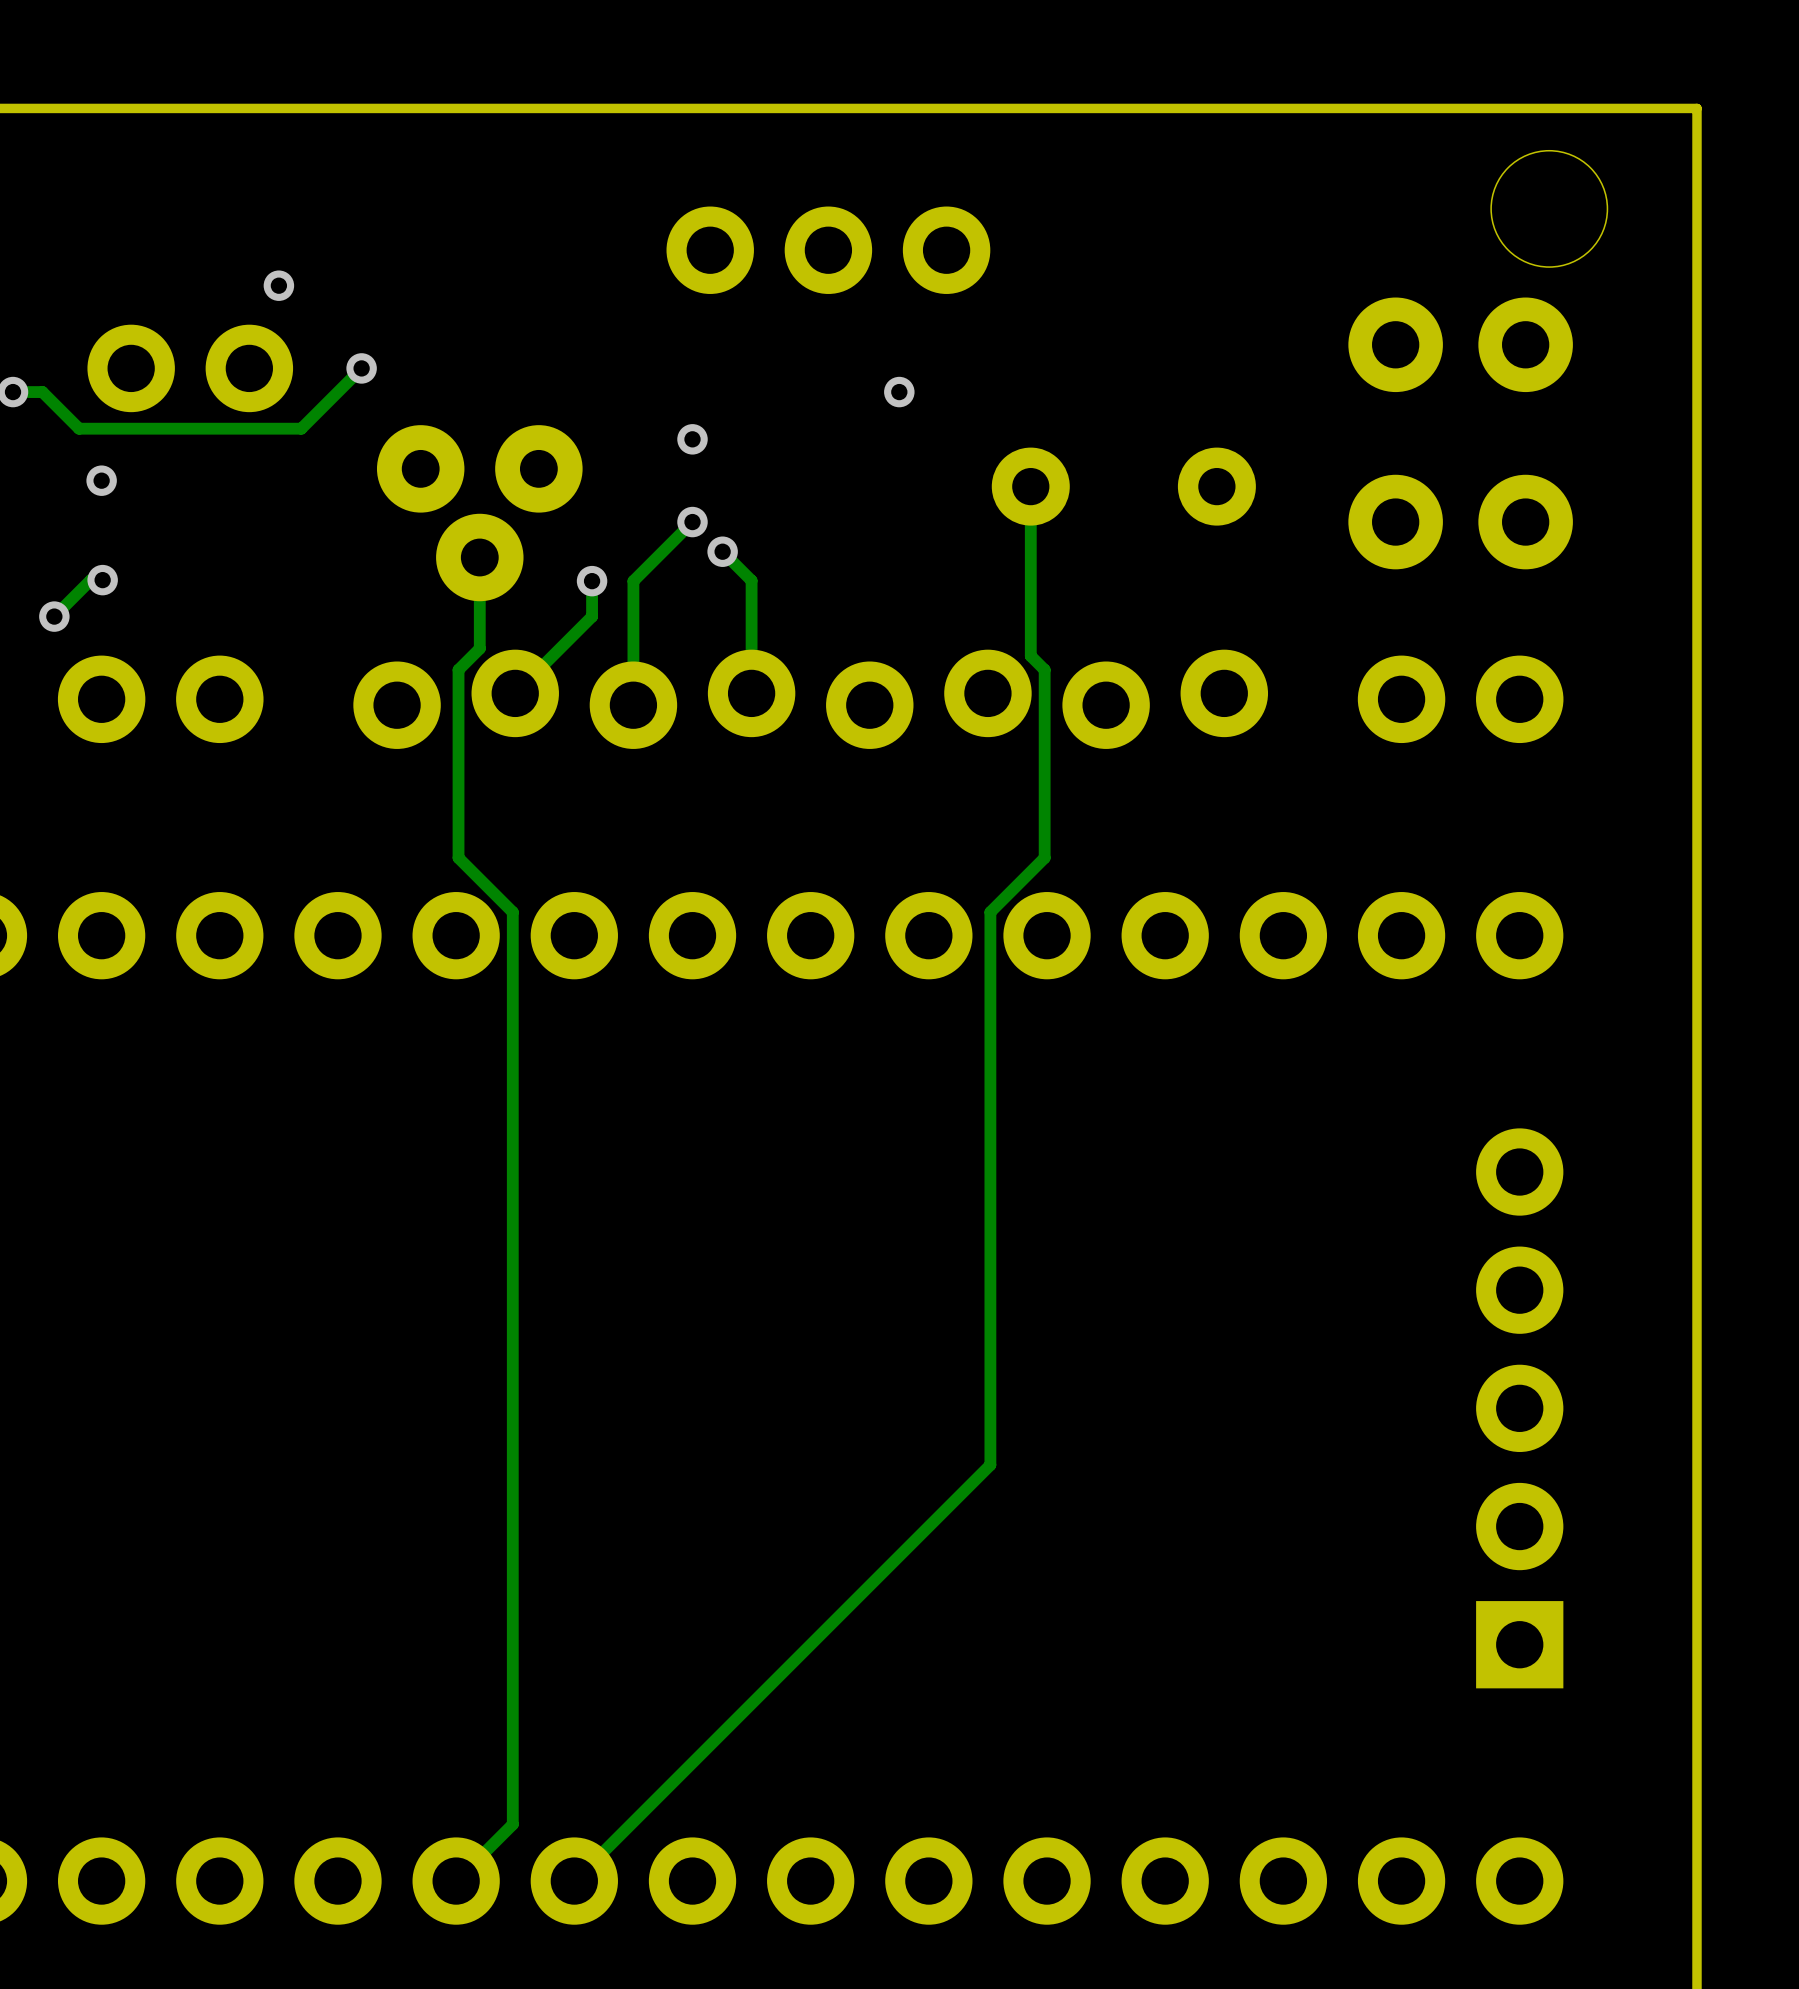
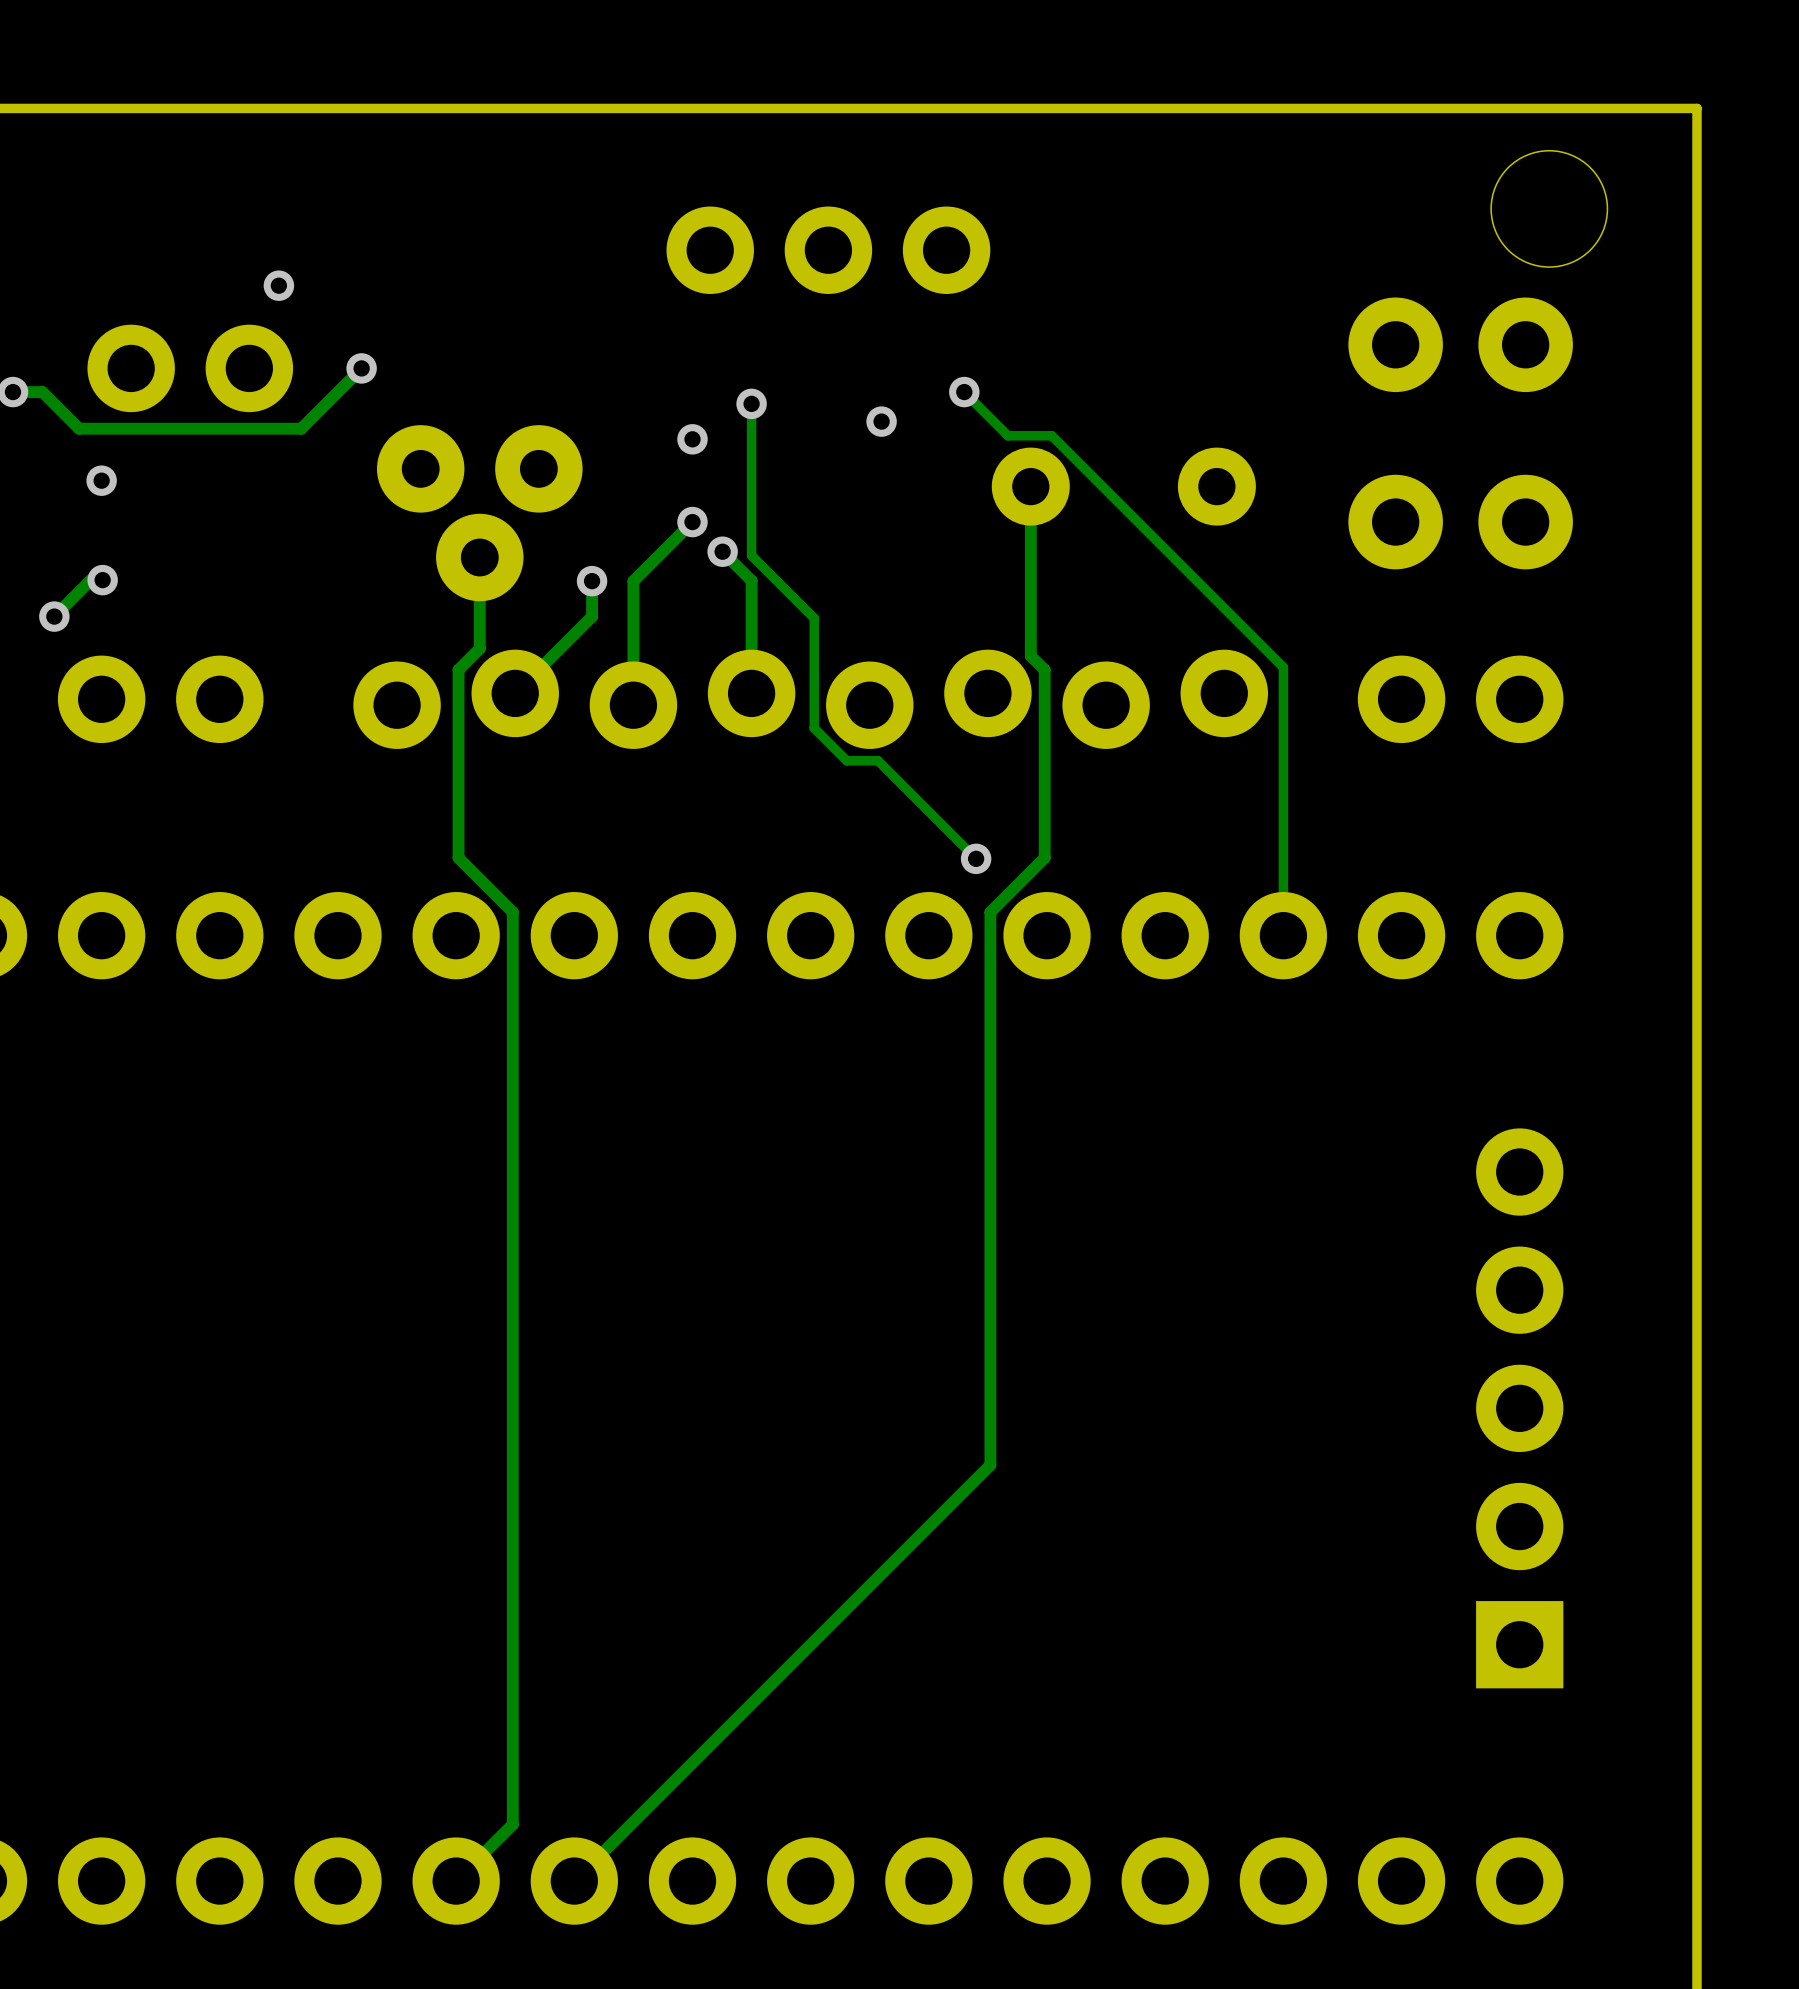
via position: (899, 392) -> (881, 421)
track: none -> (964, 392) (1008, 435) (1051, 435) (1283, 667) (1283, 935)
via: none -> (964, 392)
track: none -> (751, 403) (751, 555) (814, 618) (814, 728) (846, 760) (878, 760) (976, 858)
via: none -> (751, 403)
via: none -> (976, 858)

